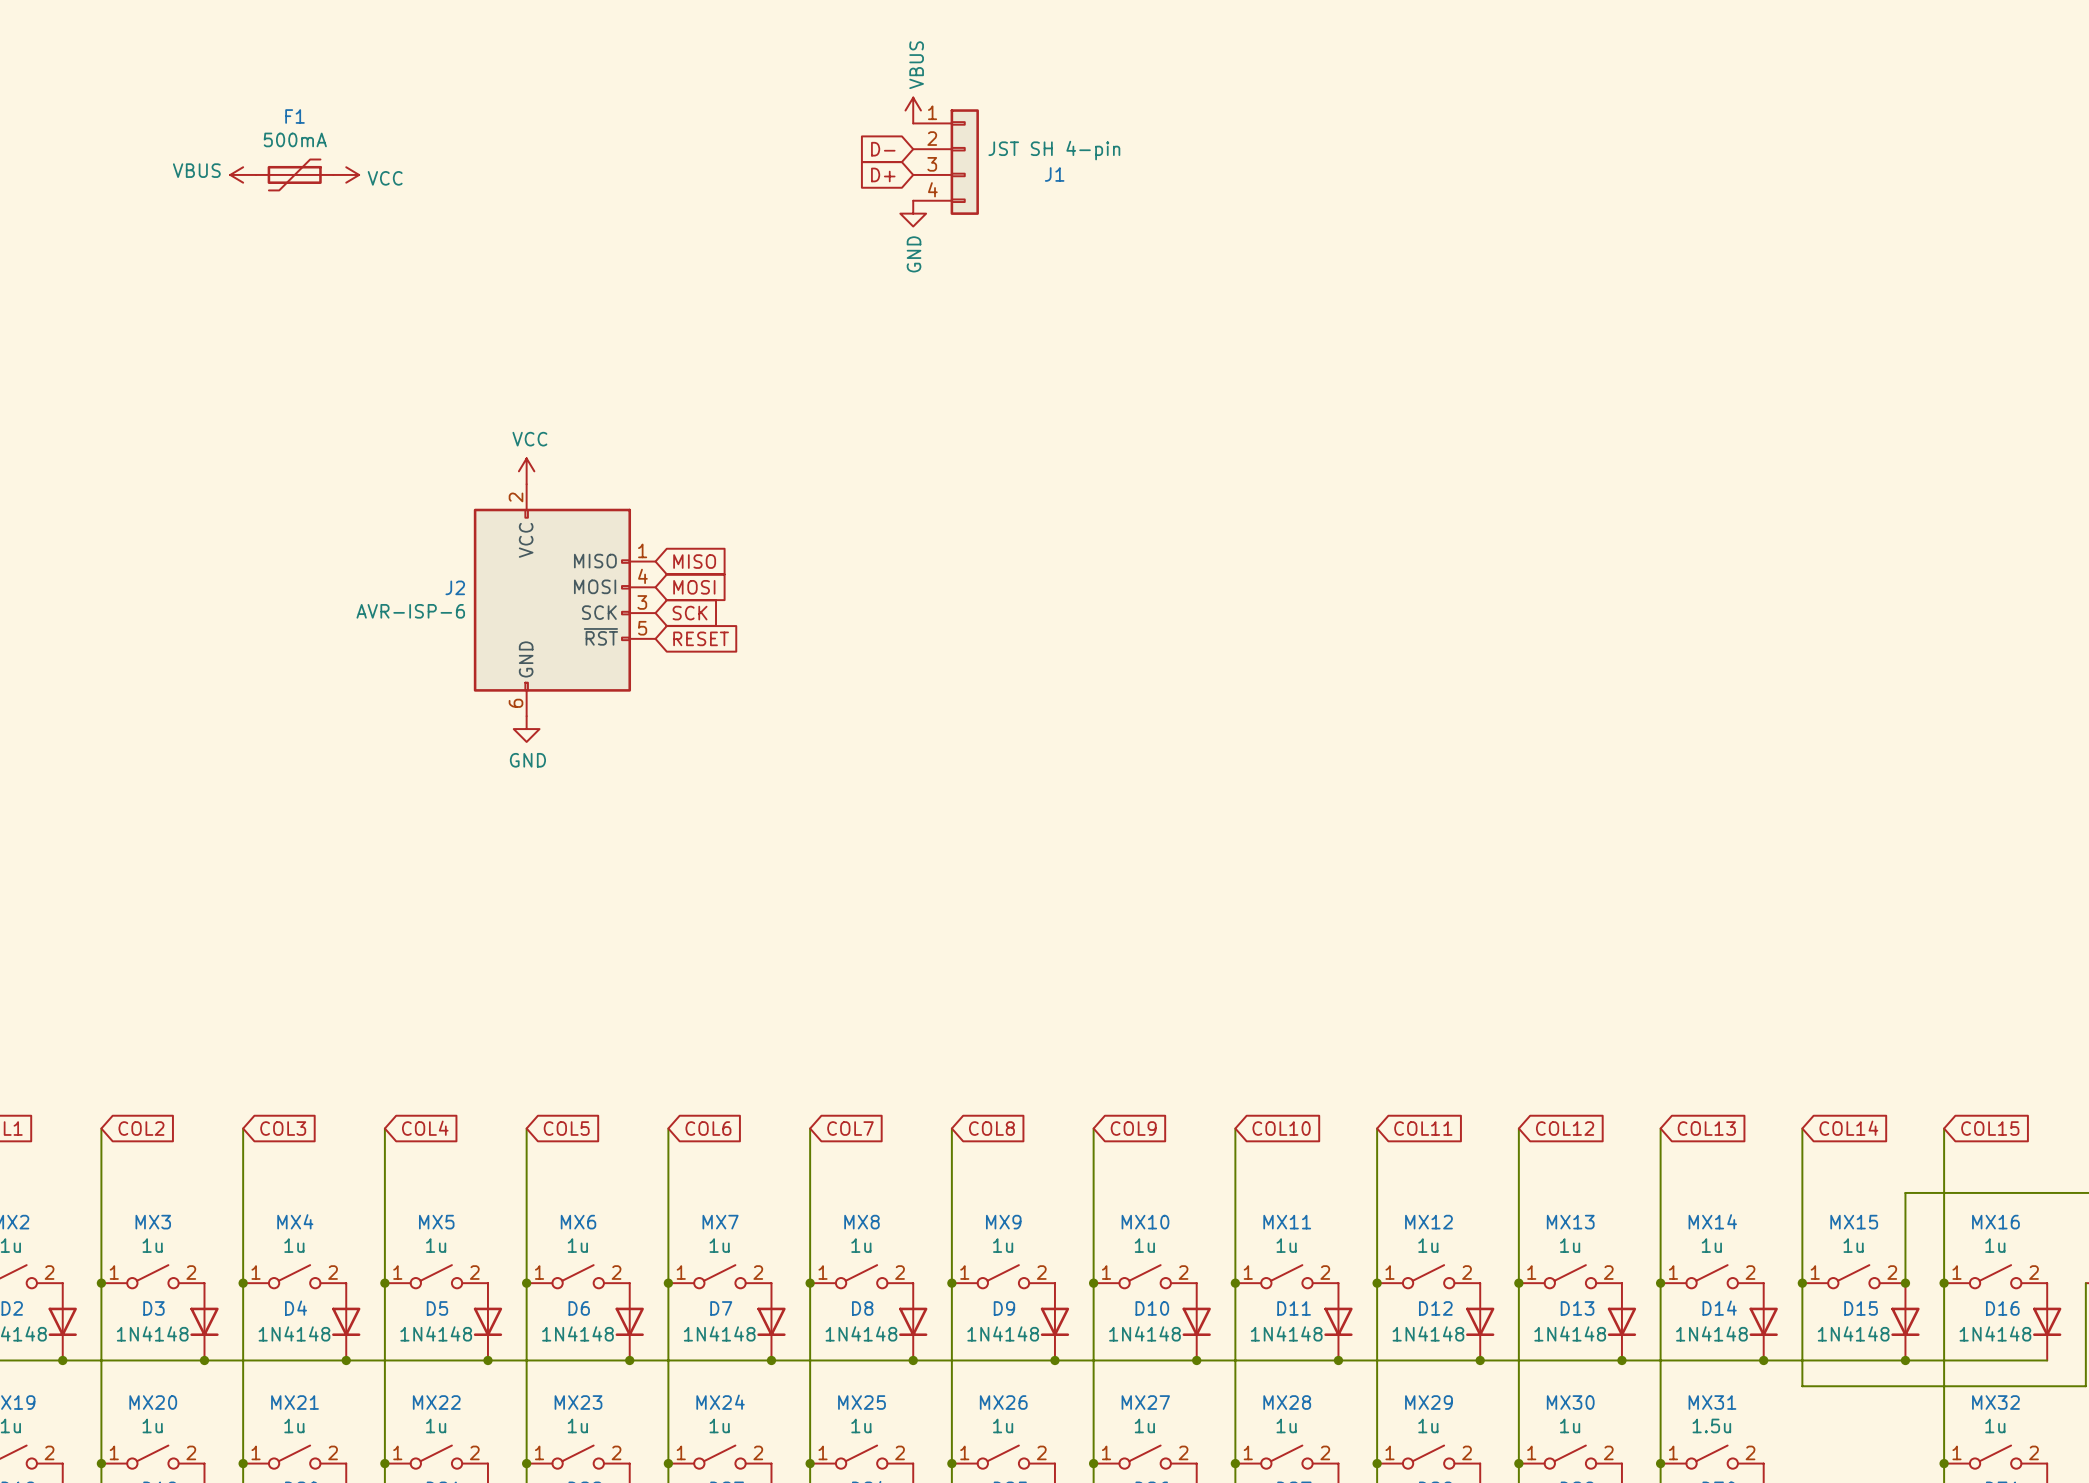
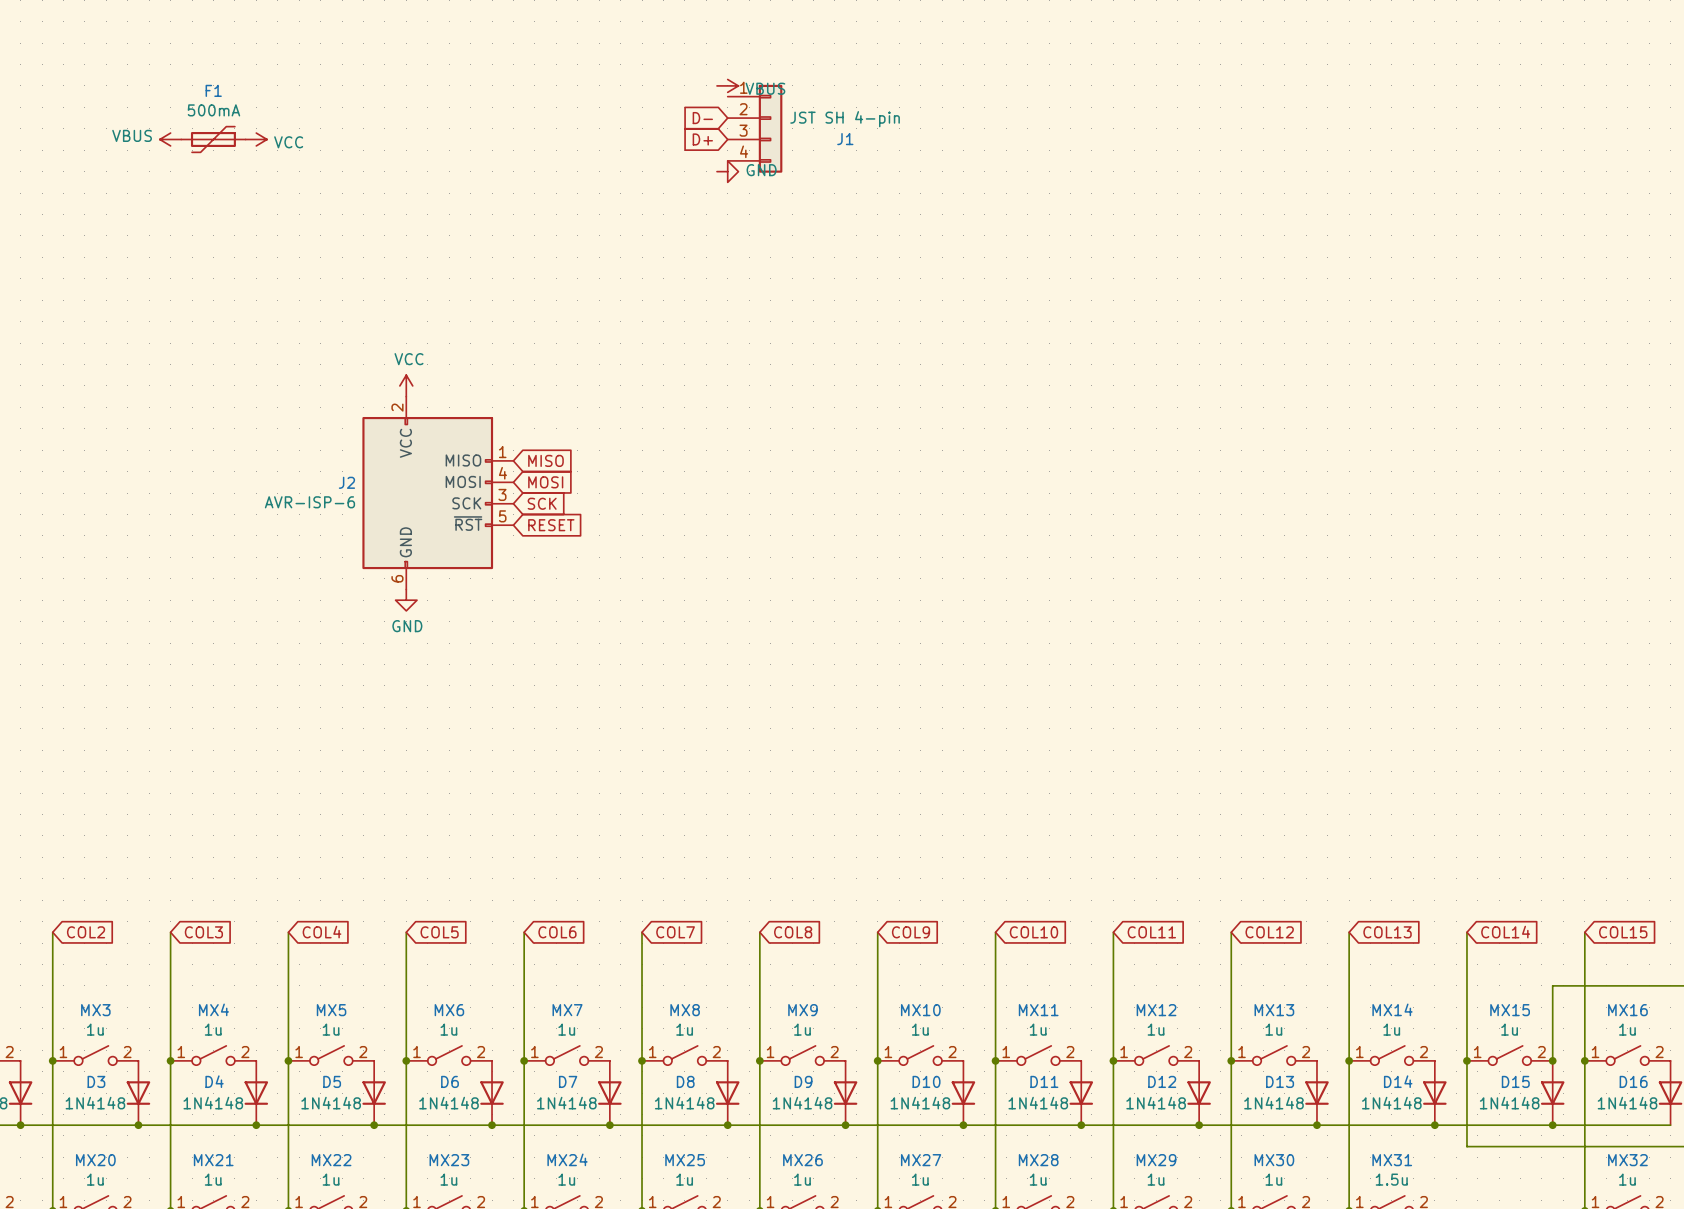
power symbol rotation: 0° (913, 110) -> 90° clockwise (727, 85)
power symbol rotation: 0° (913, 213) -> 90° counterclockwise (727, 171)

